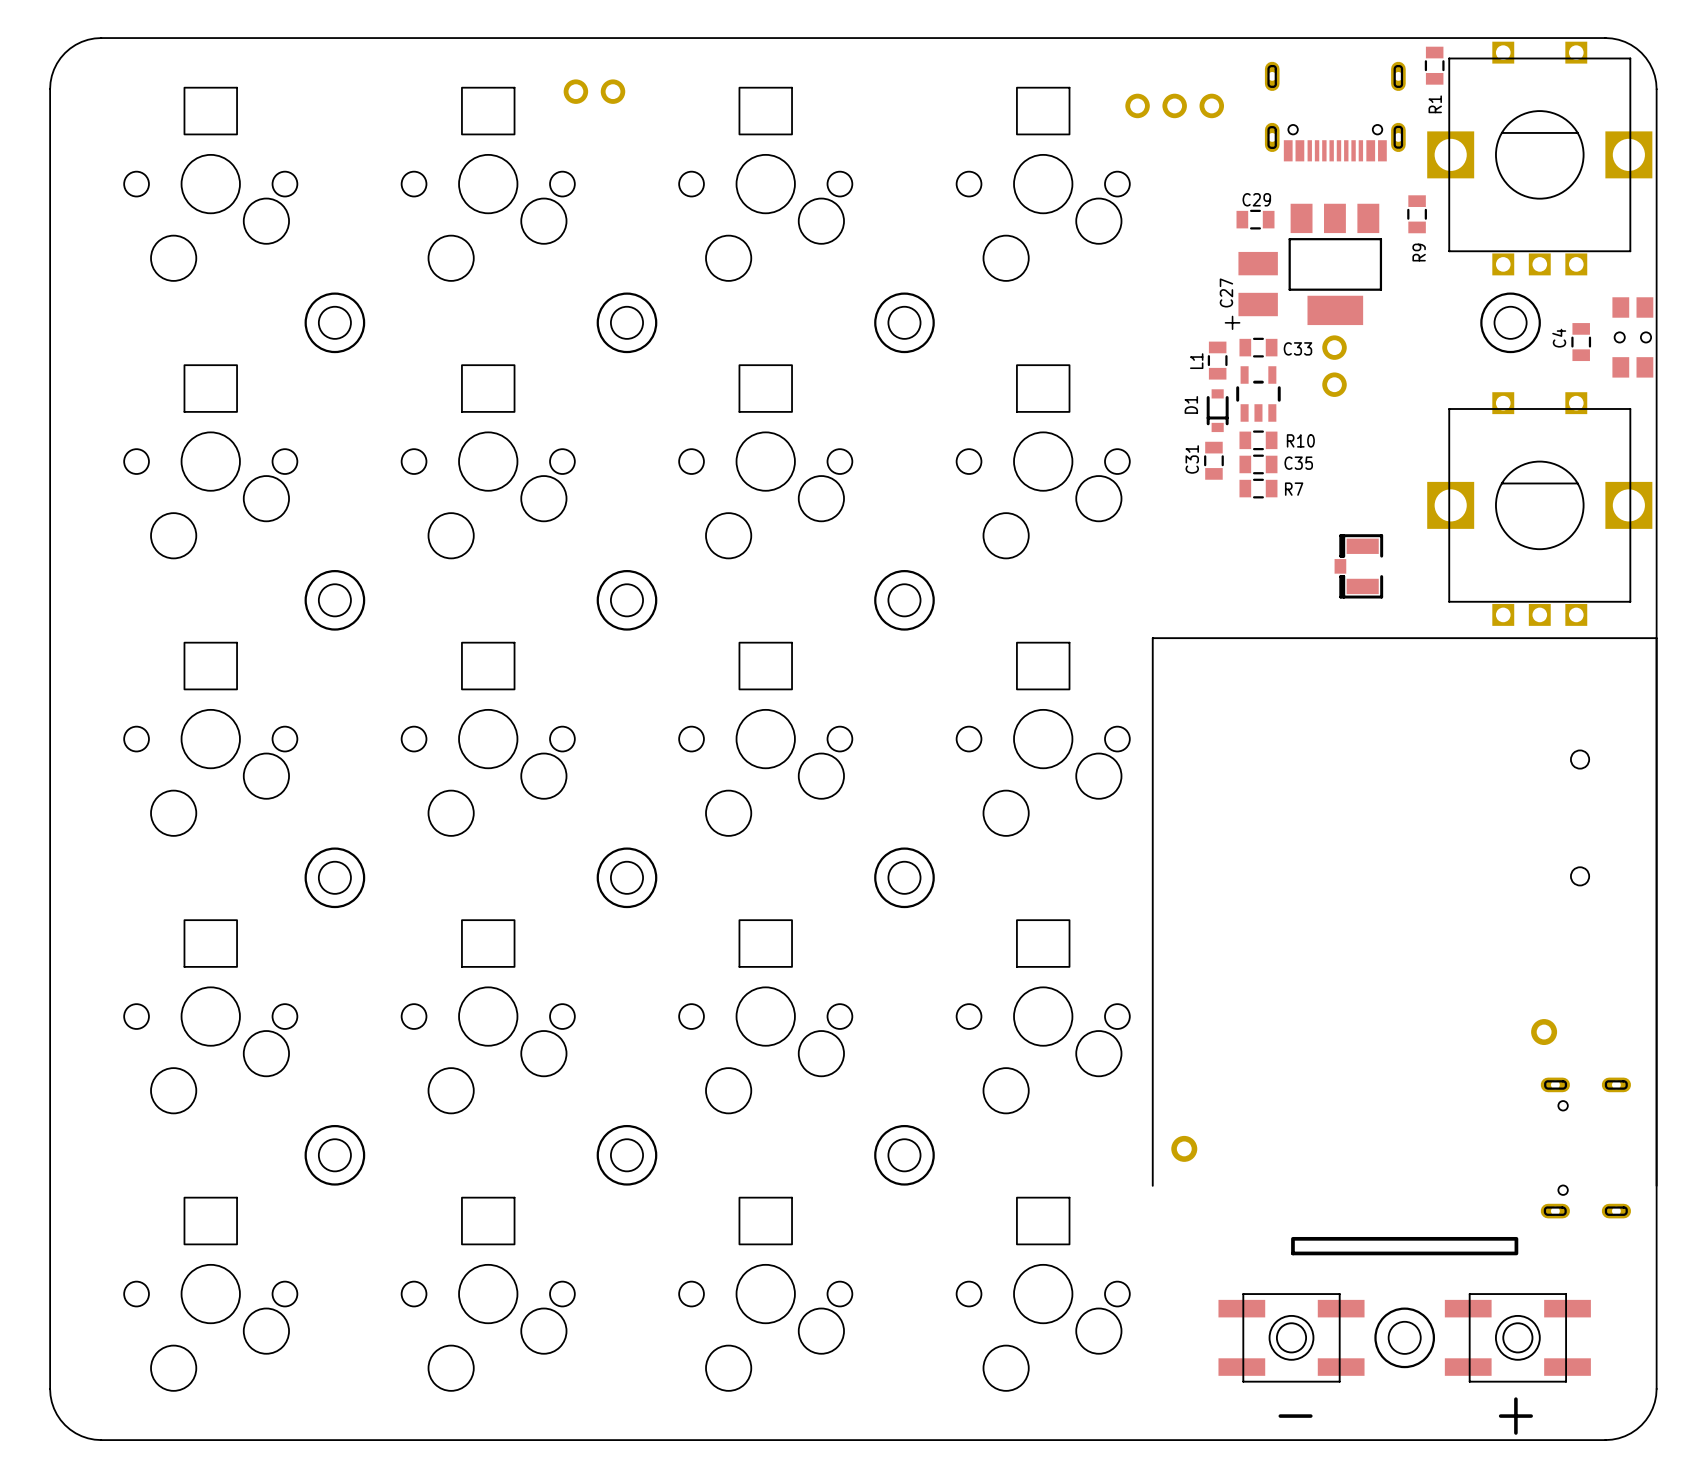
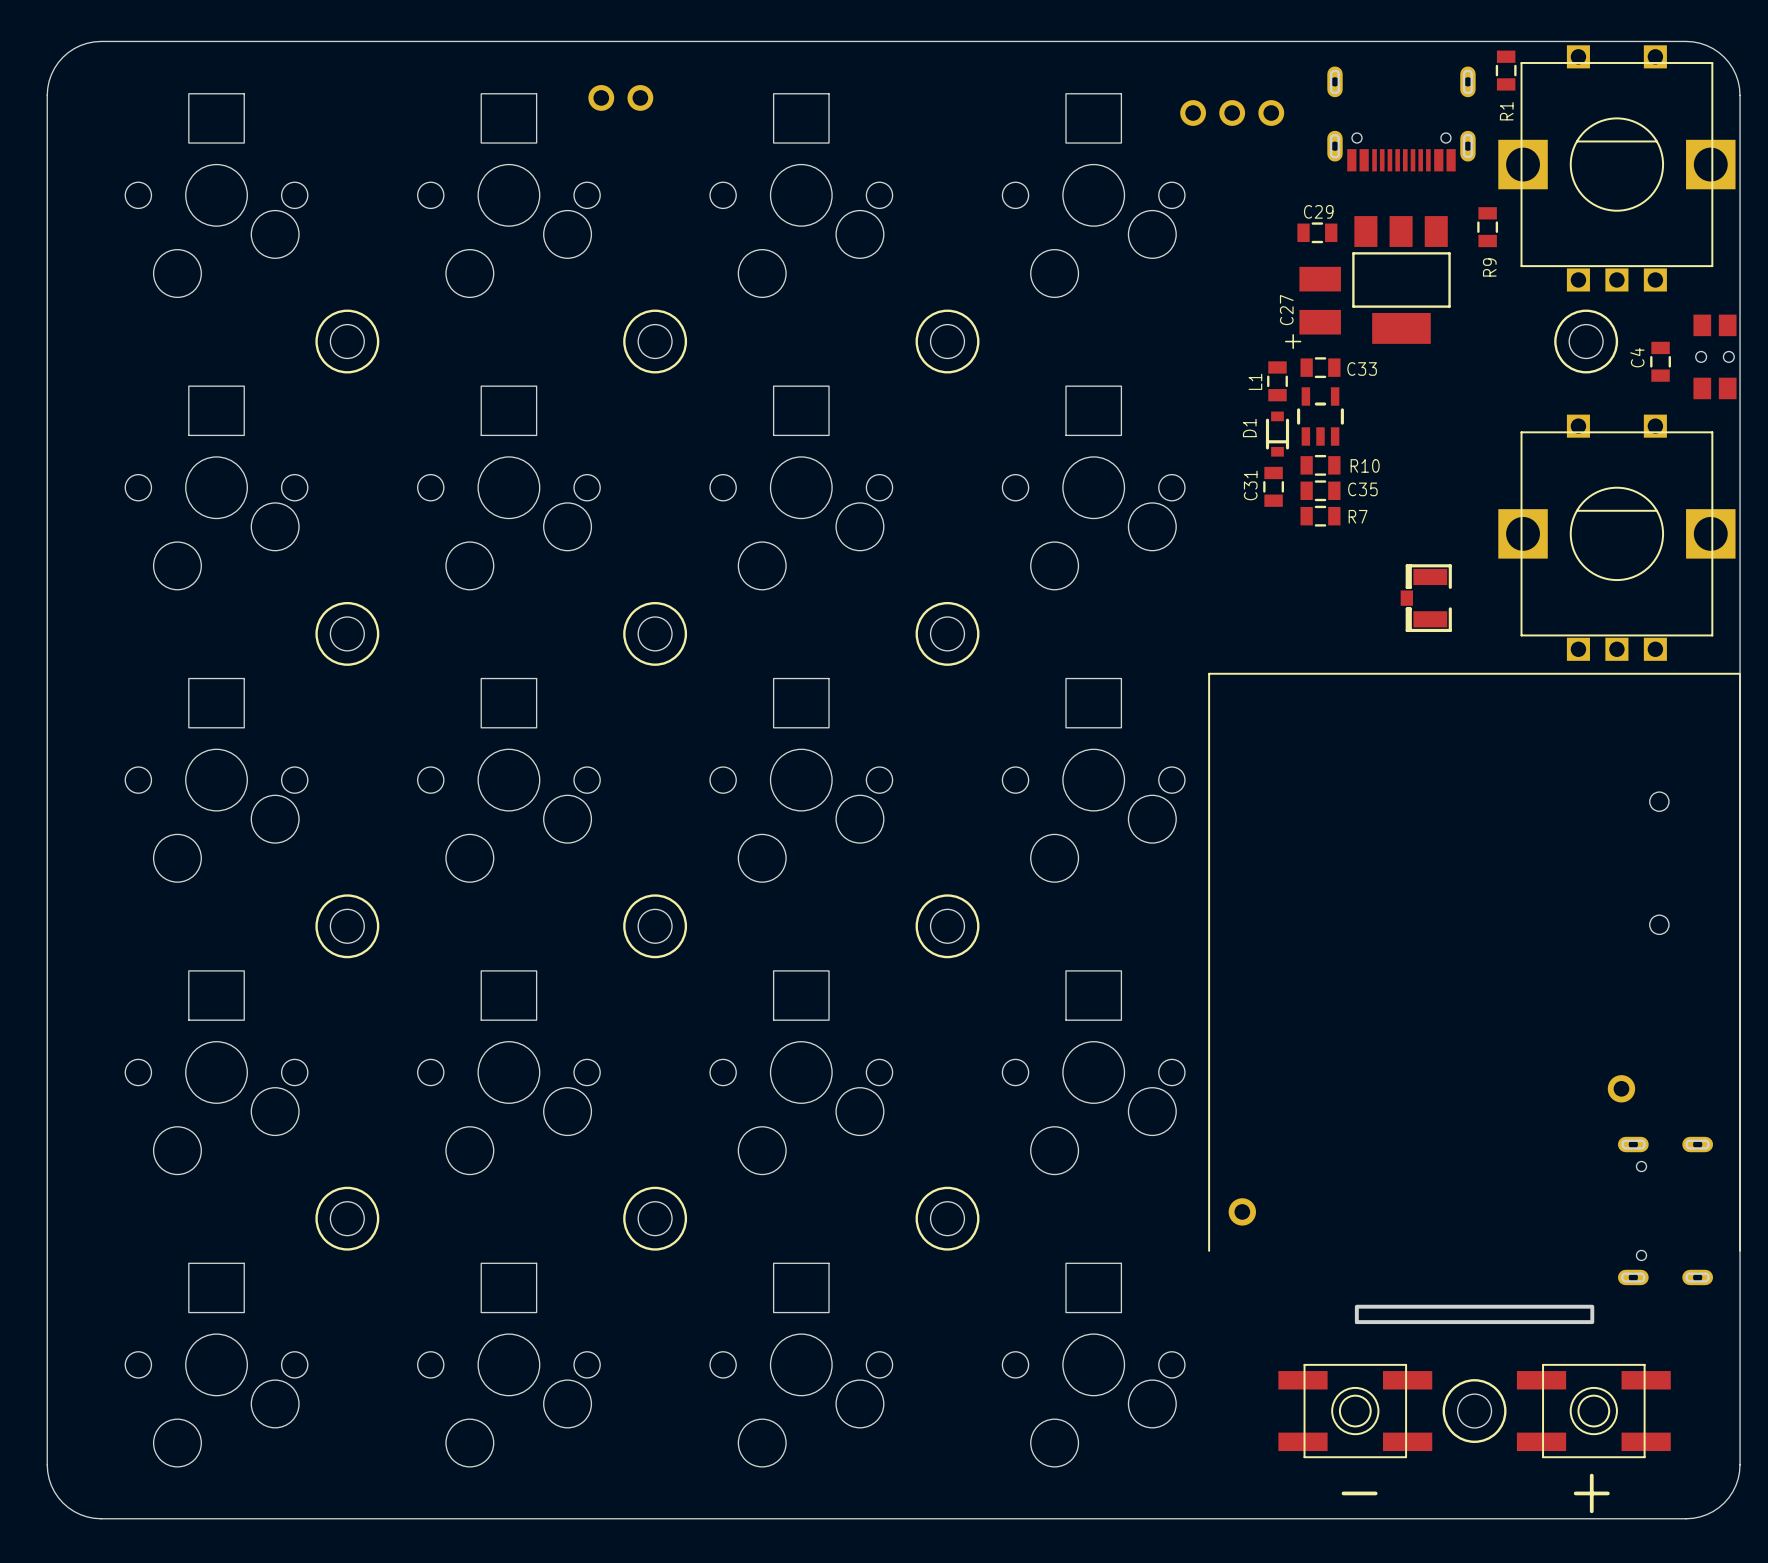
part: (1334, 366) -> none

